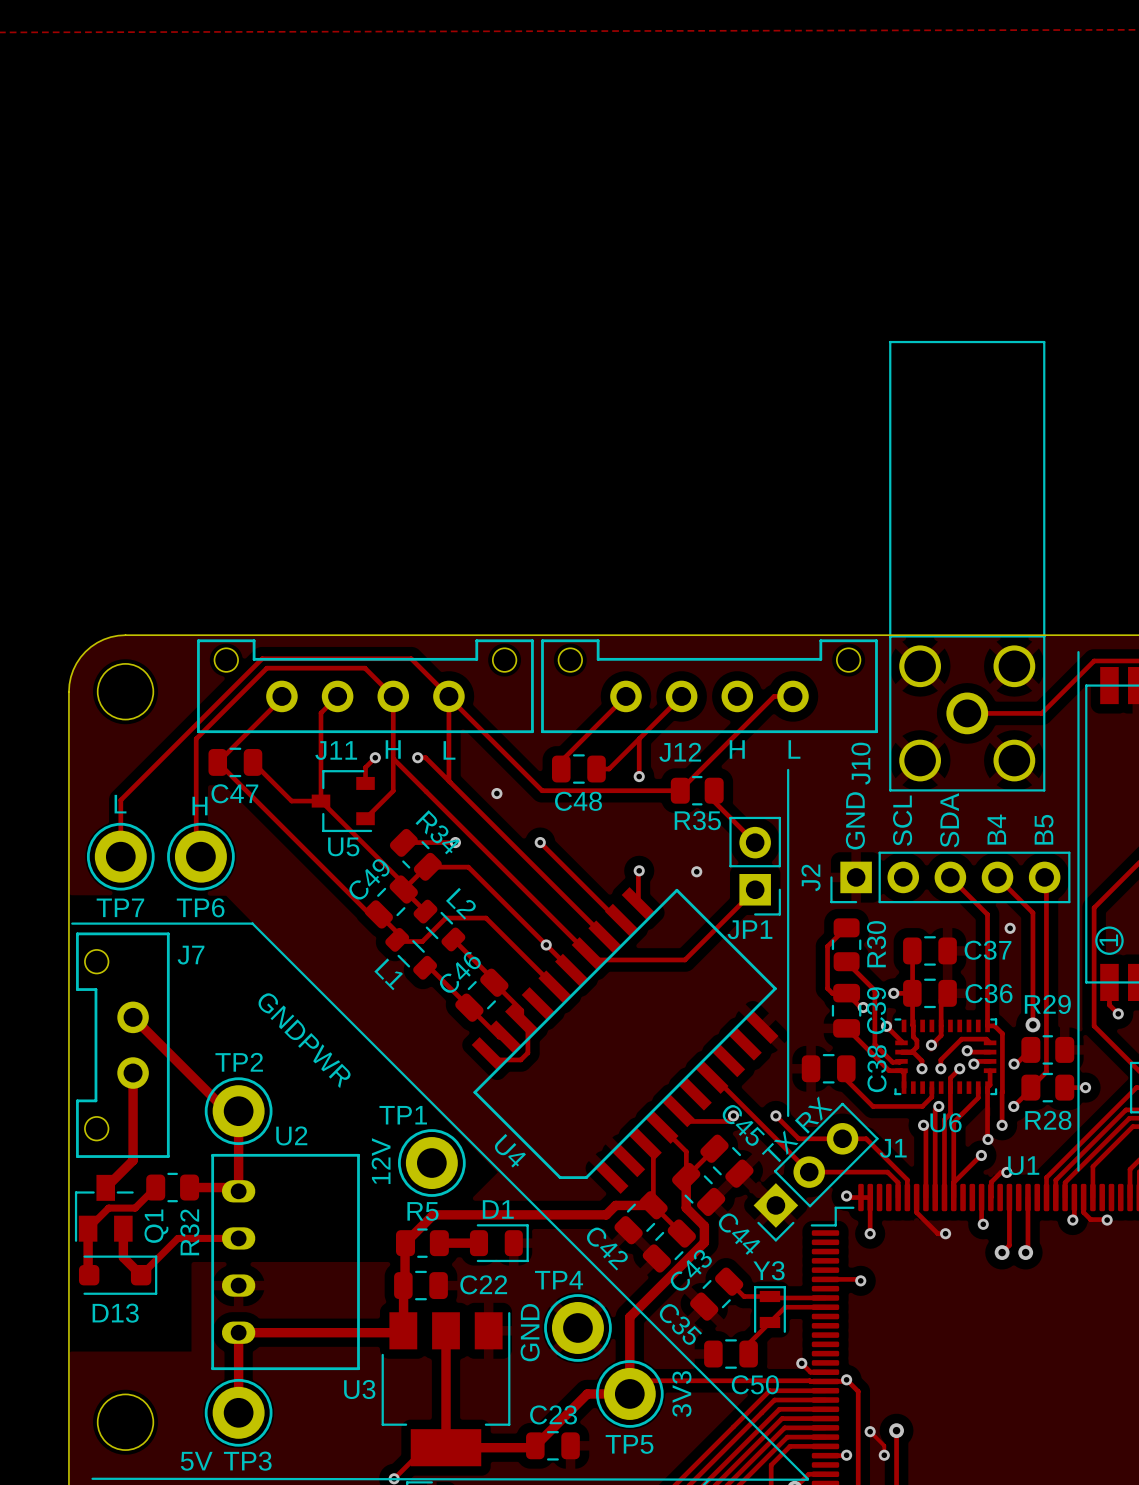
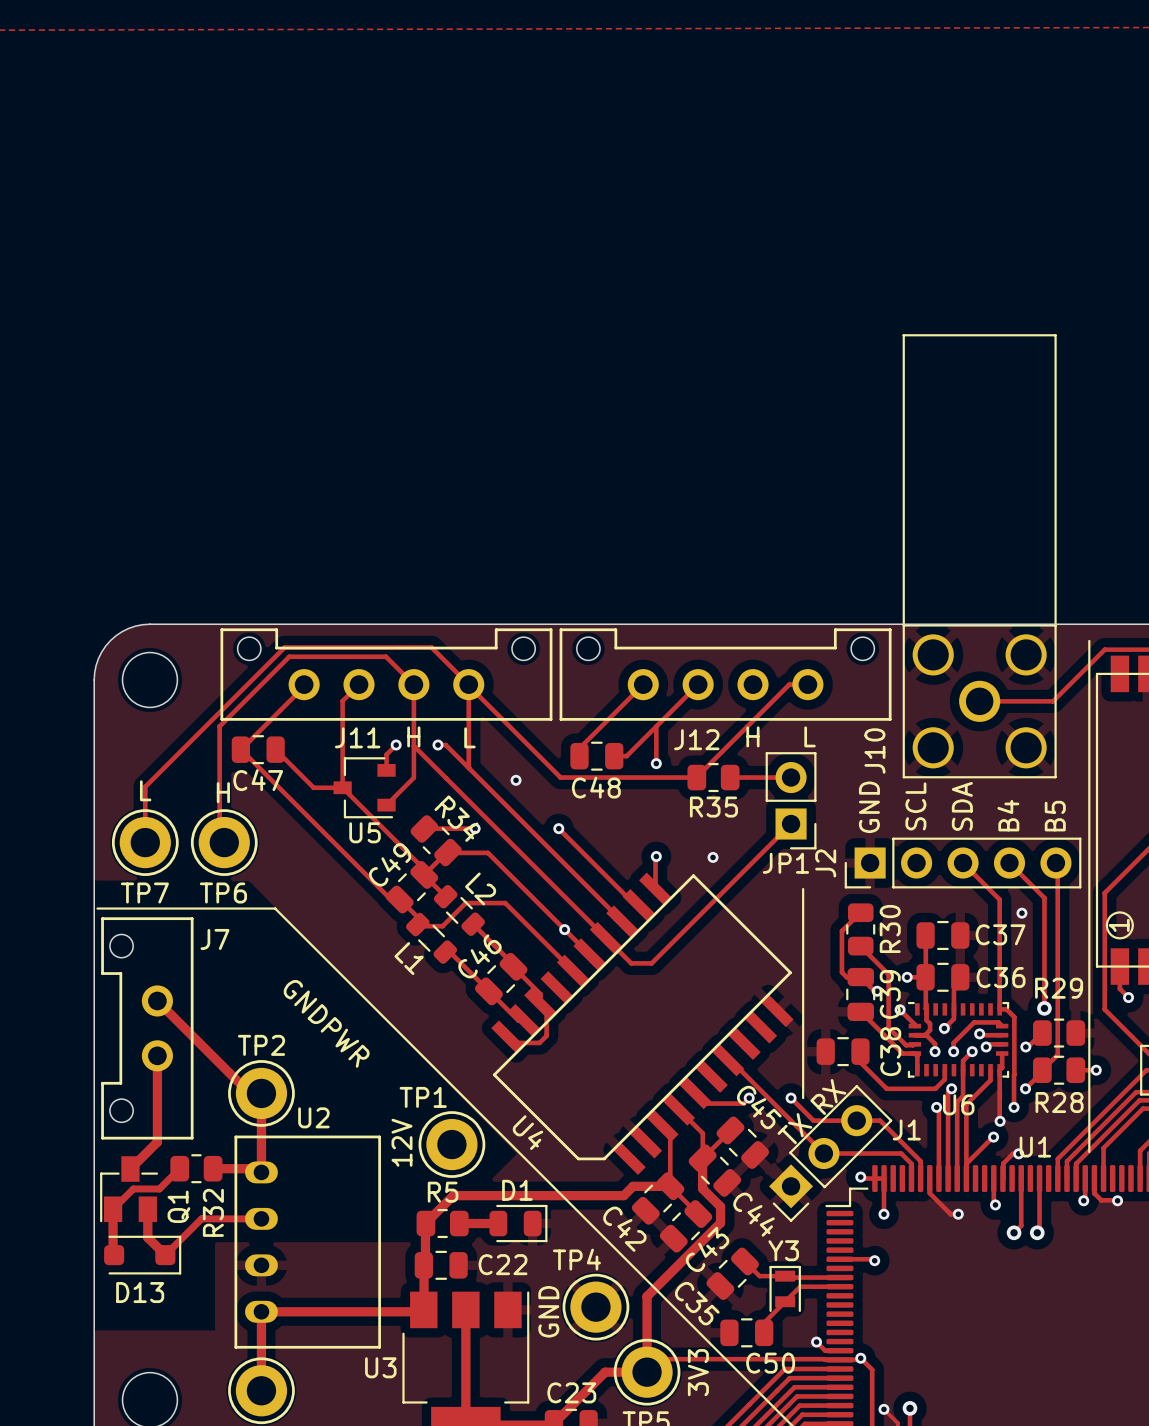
line: (788, 769) (788, 903) -> none
track: (714, 790) (714, 801) (755, 842) -> (730, 777) (791, 777)
JP1 position: (755, 866) -> (791, 800)
track: (755, 889) (684, 959) (594, 959) -> (791, 823) (651, 963) (631, 963) (612, 944)

